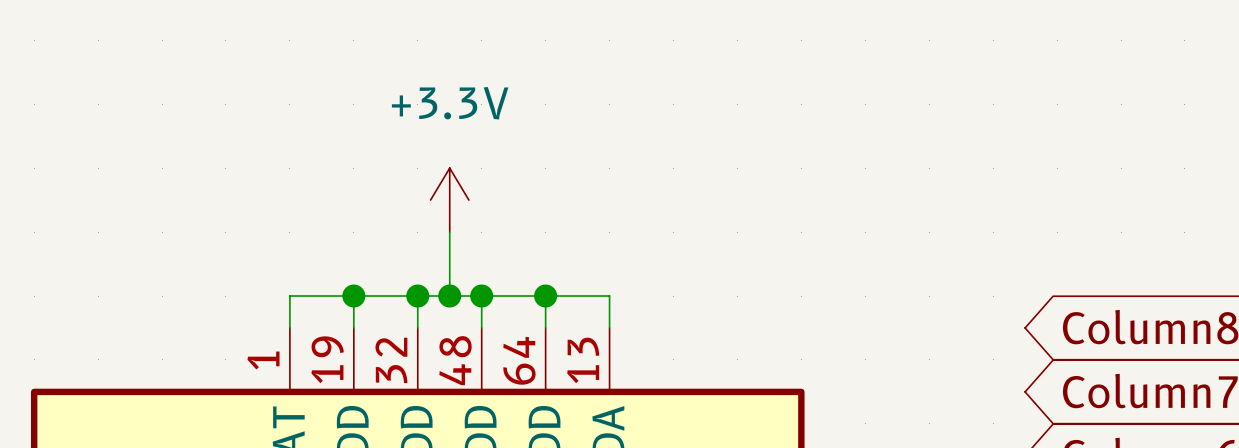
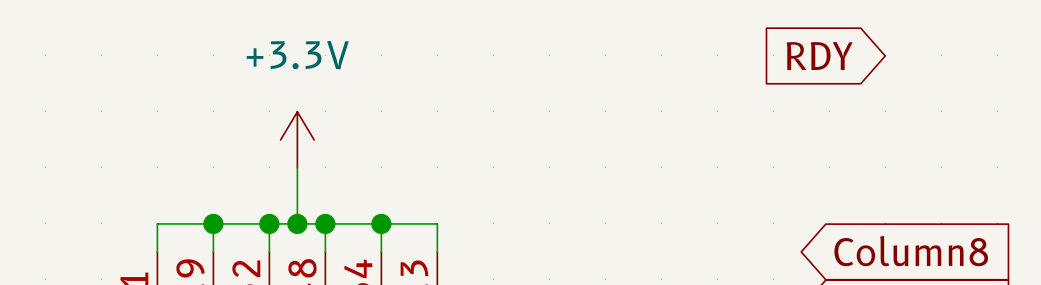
global label: none -> RDY (819, 55)

